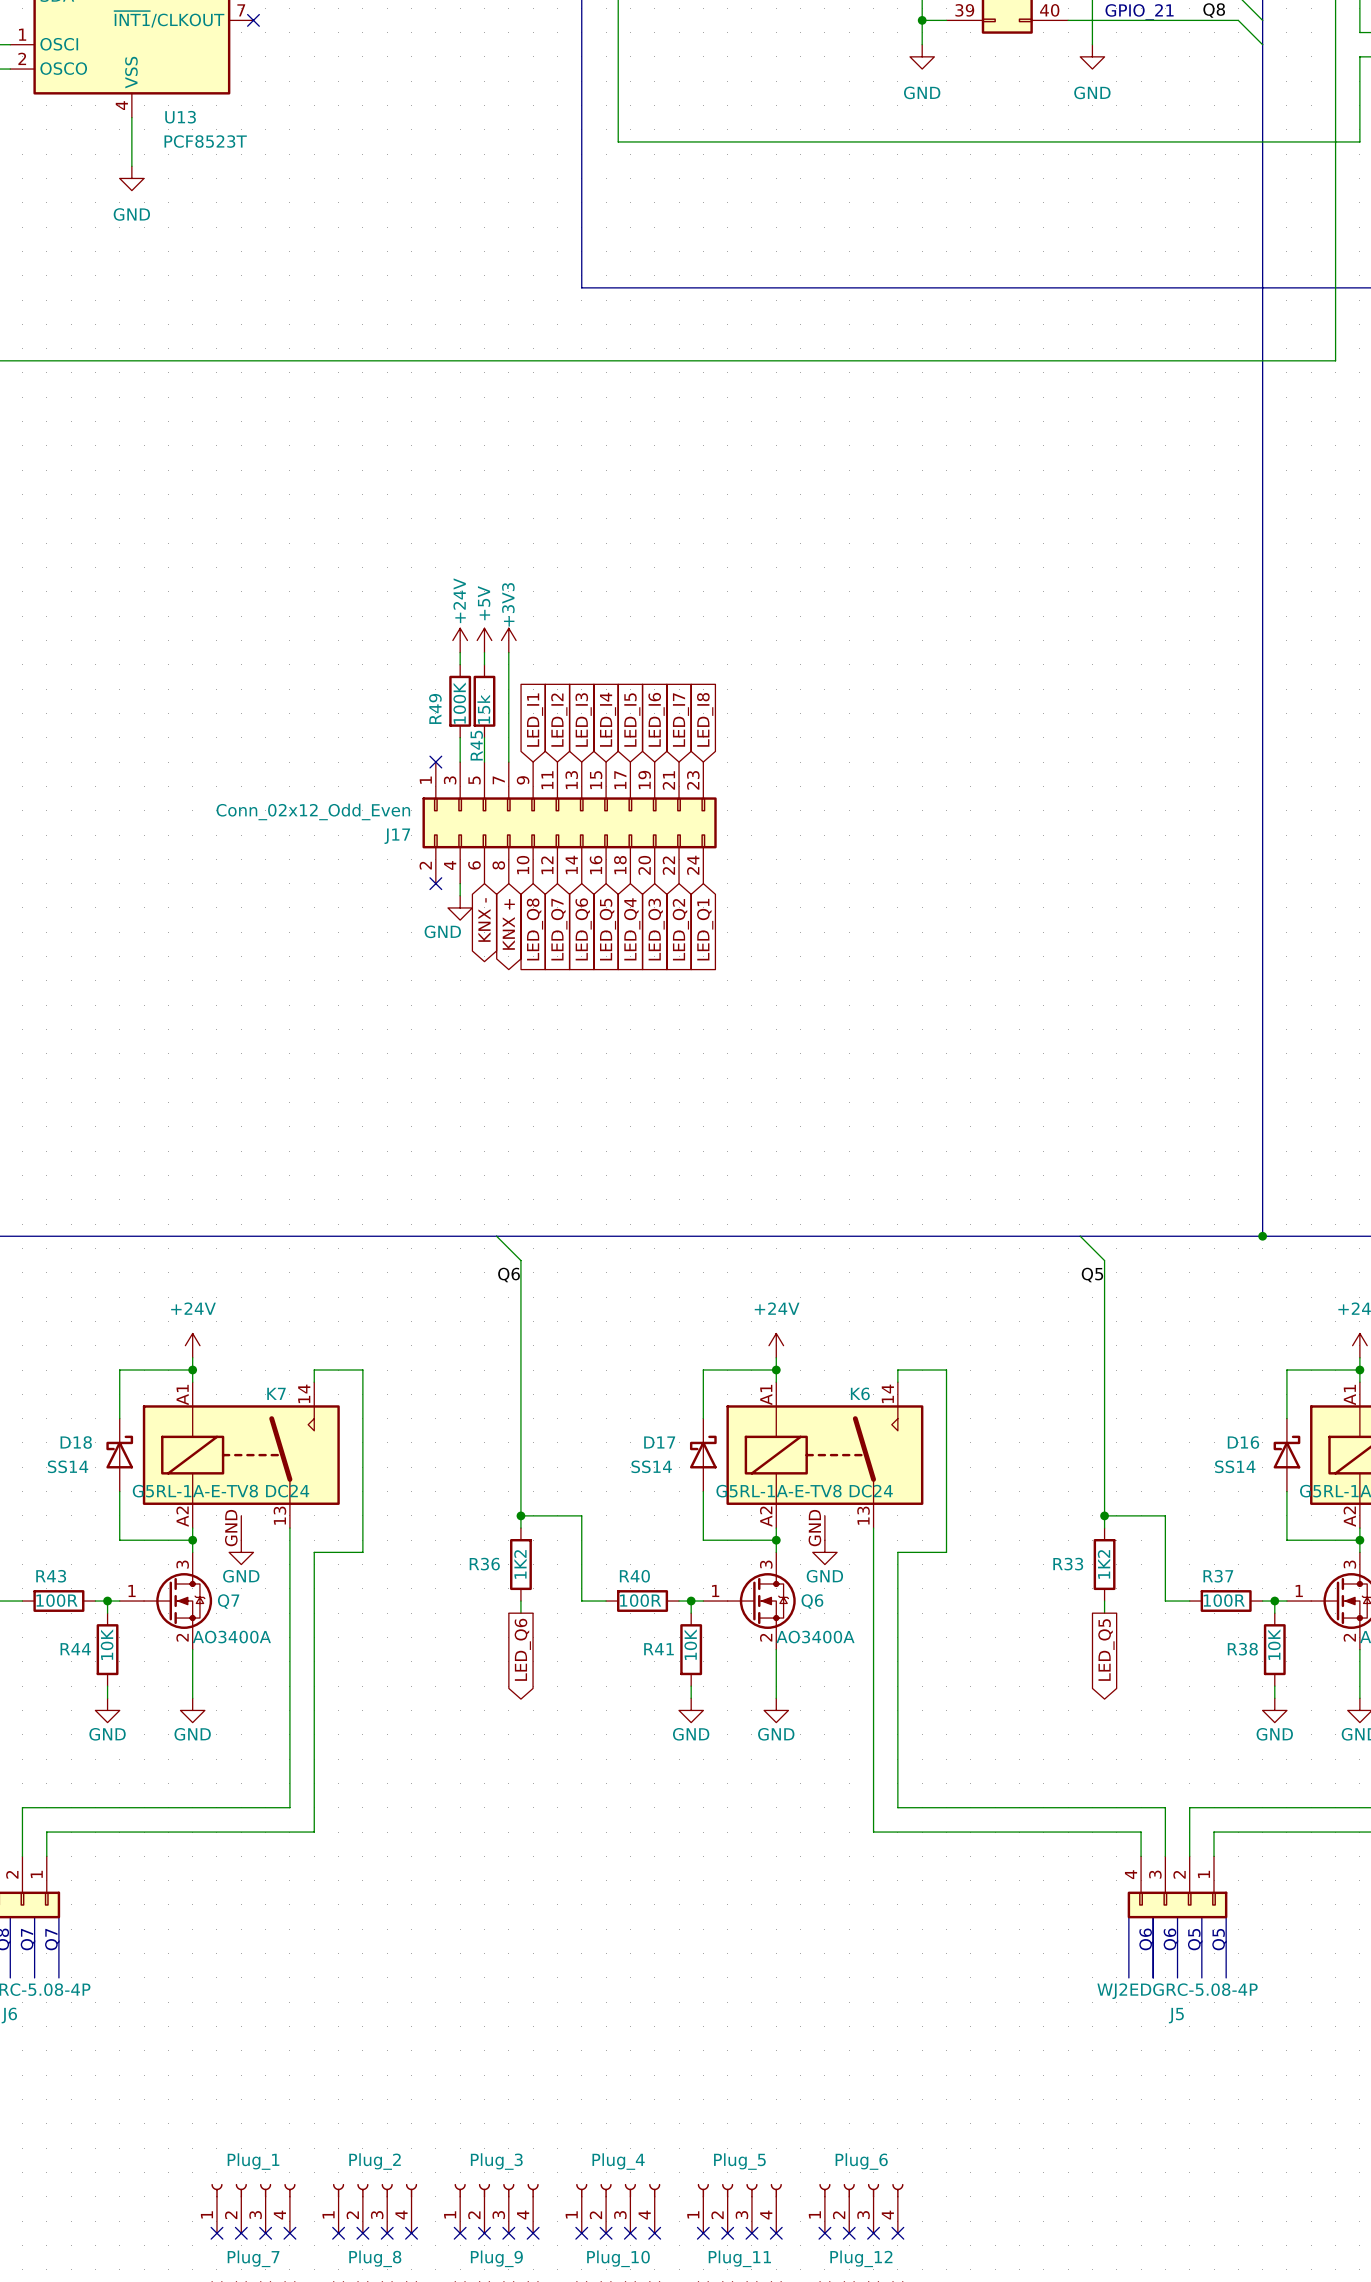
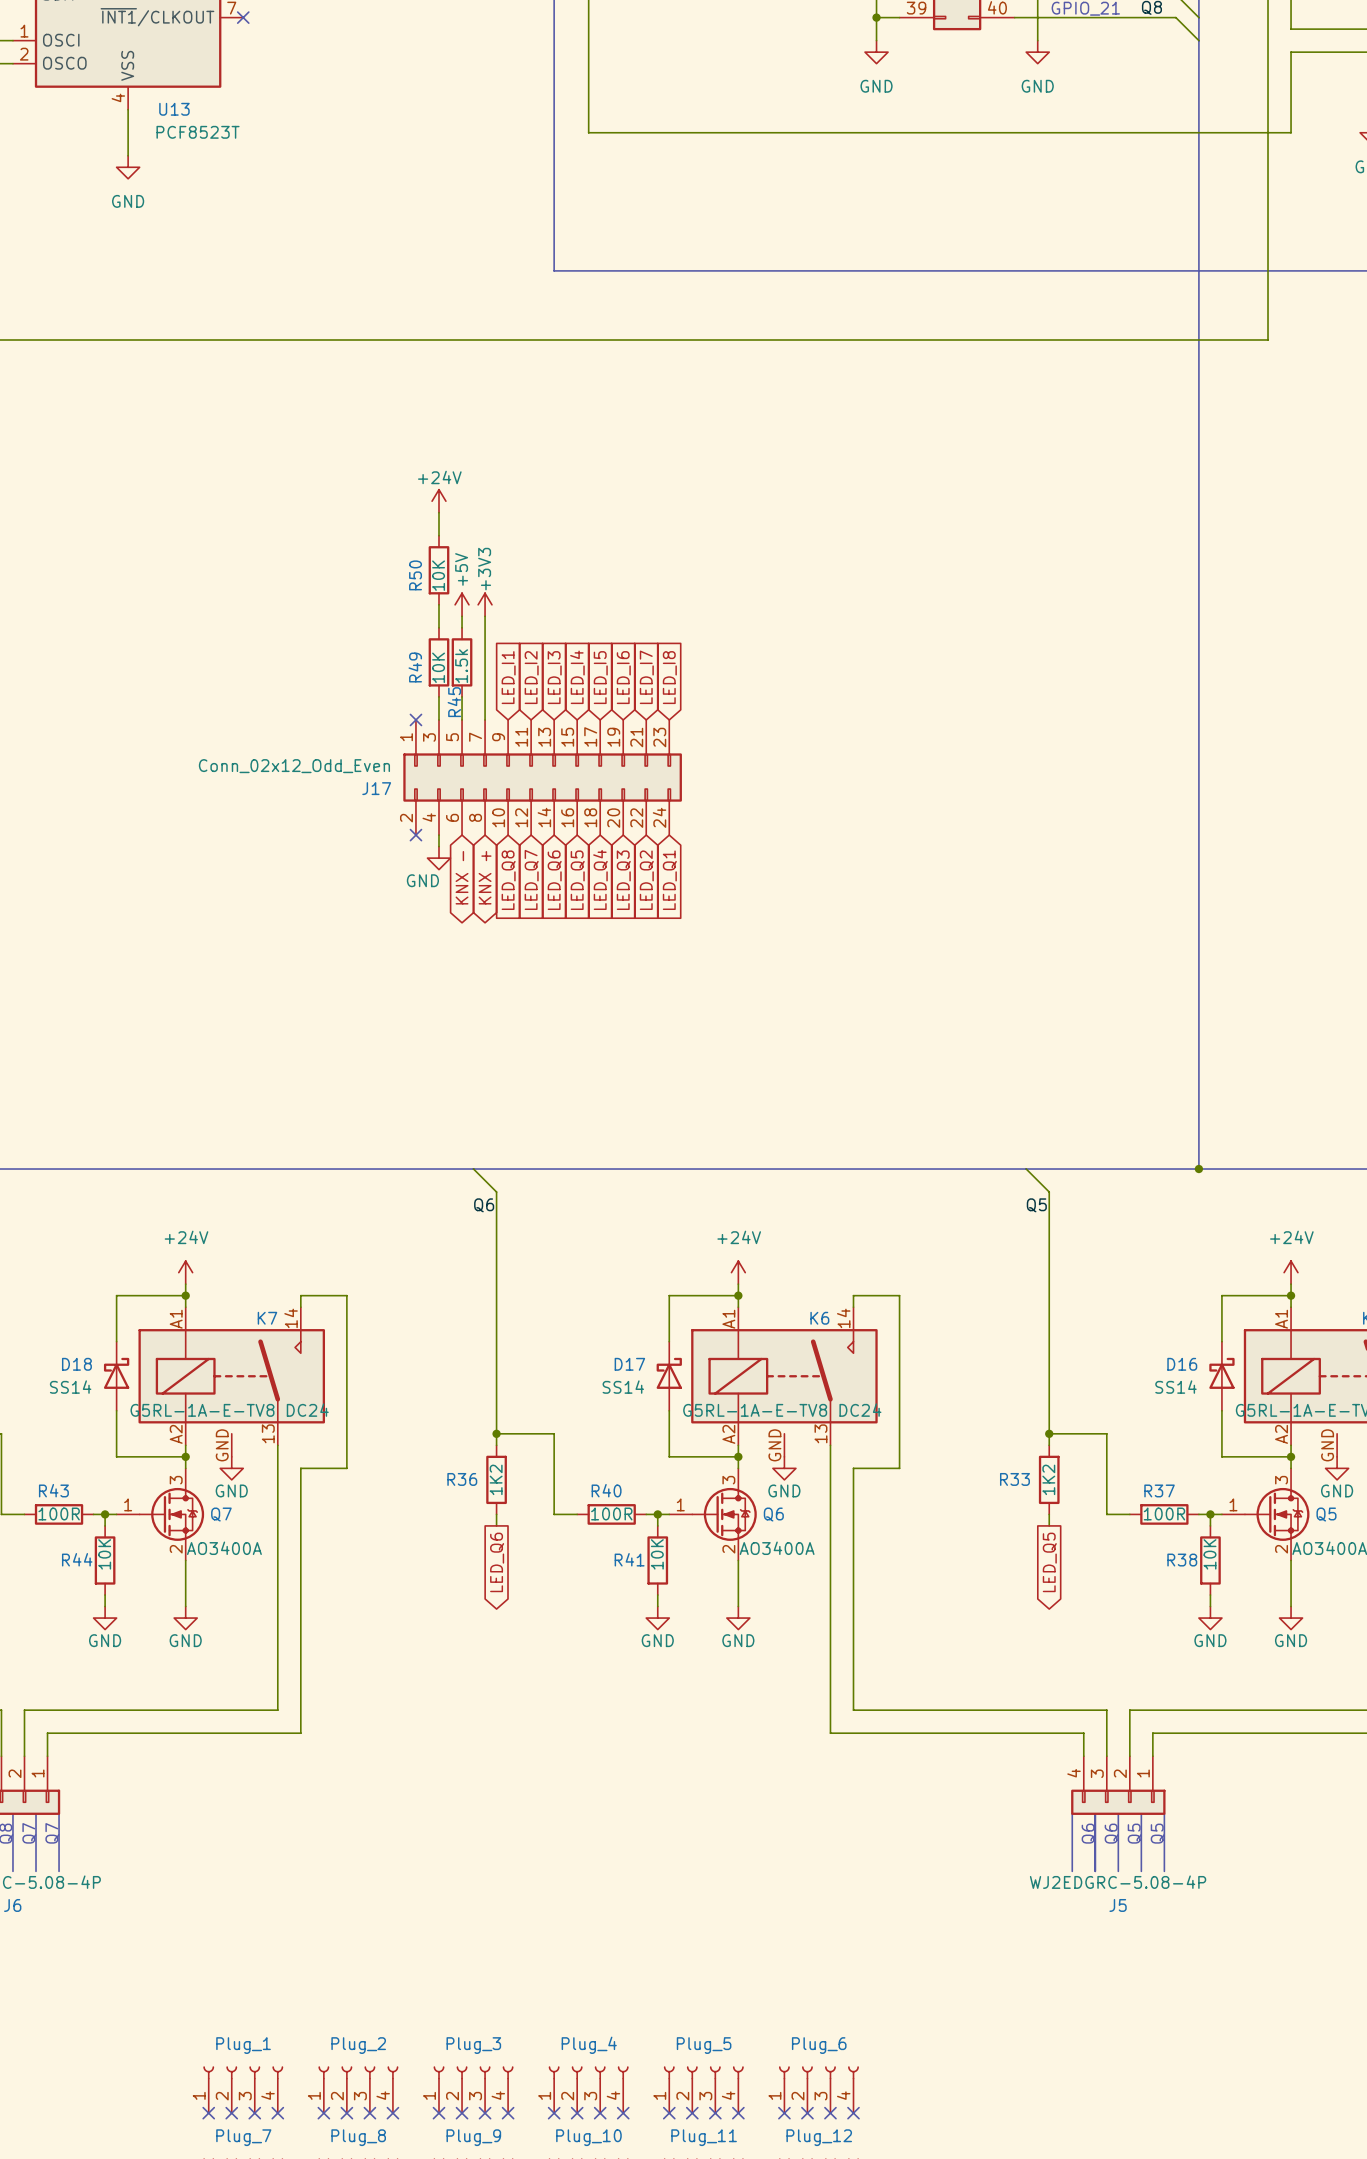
wire: none -> (438, 512) (438, 535)
power symbol text rotation: 0° (459, 600) -> 90° clockwise (439, 477)
R50: none -> 10K (438, 570)
power symbol position: +24V (460, 640) -> +24V (438, 501)
R49 value: 100K (459, 703) -> 10K (438, 667)
R45 value: 15k (483, 709) -> 1.5k (461, 666)

